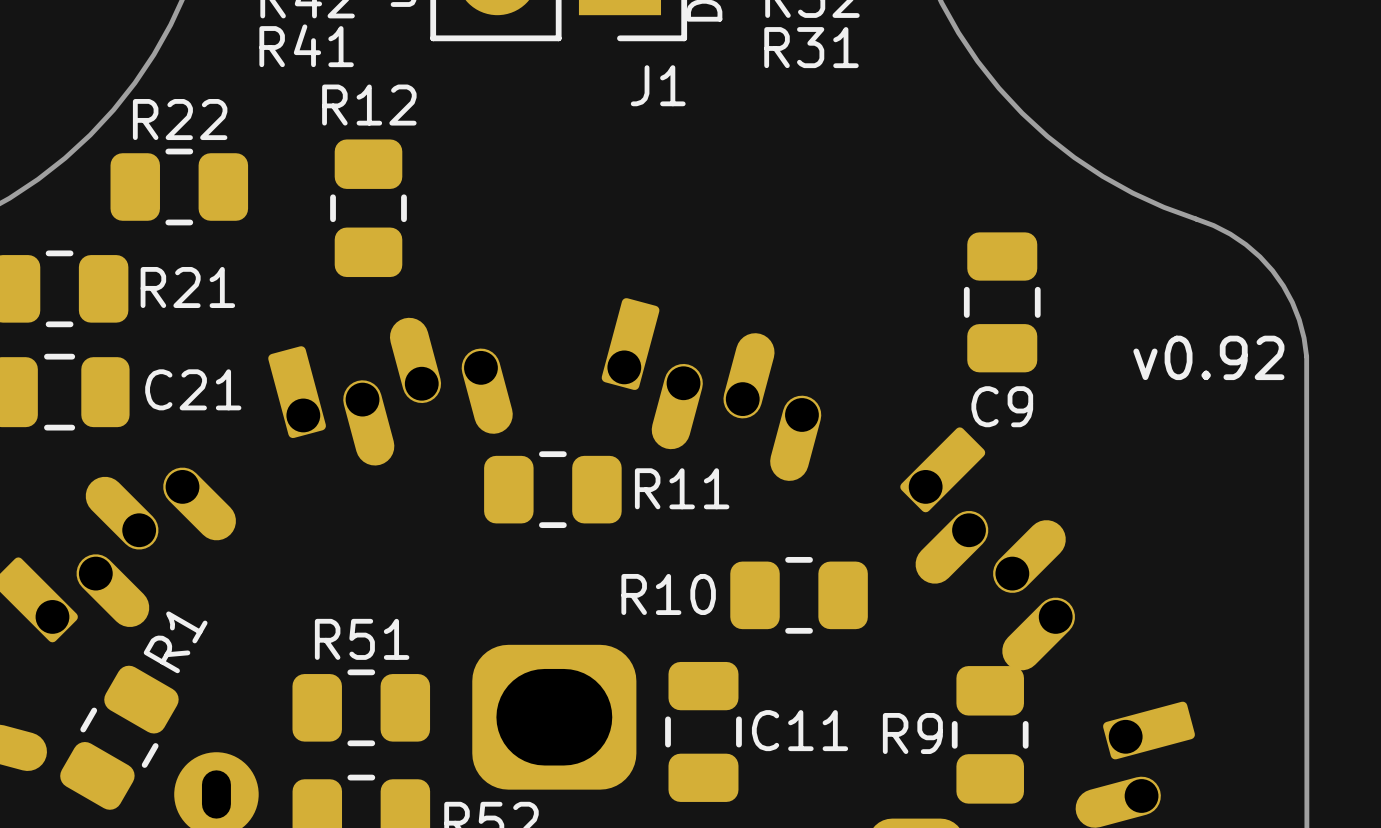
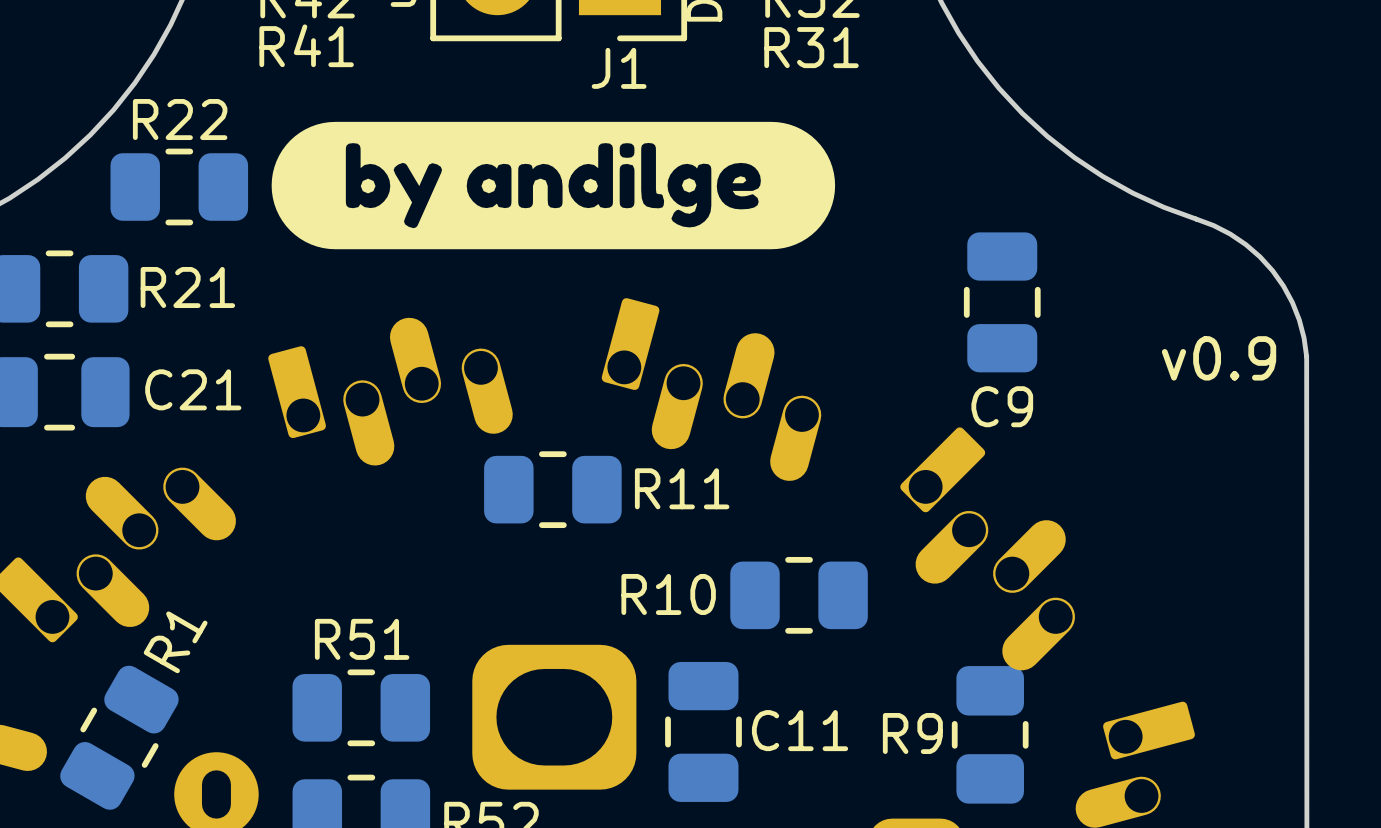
J1 name position: J1 (658, 85) -> J1 (619, 68)
drawing: none -> [271, 121, 836, 250]
R12: (368, 208) -> none
text: v0.92 (1208, 357) -> v0.9 (1219, 358)

